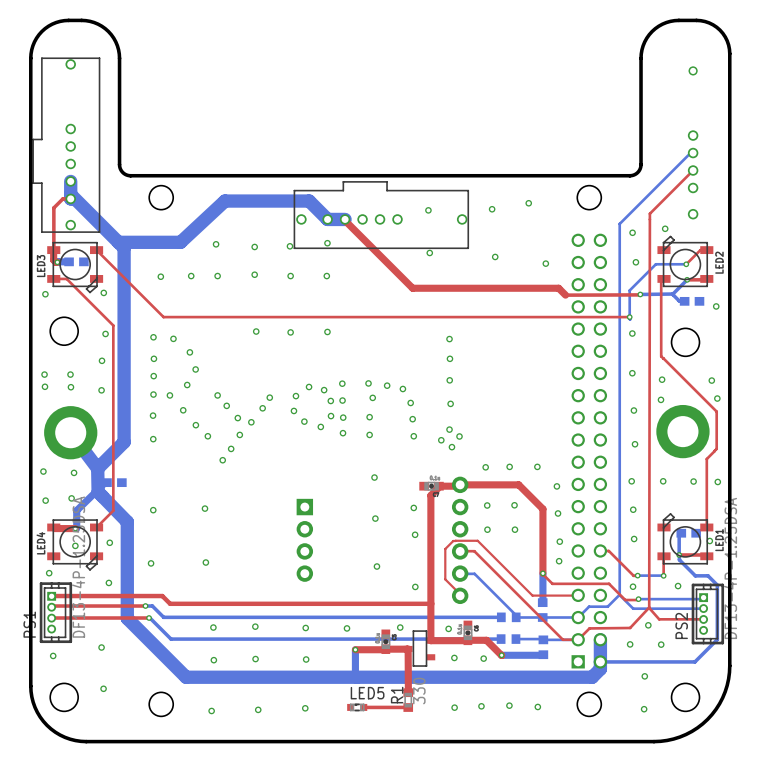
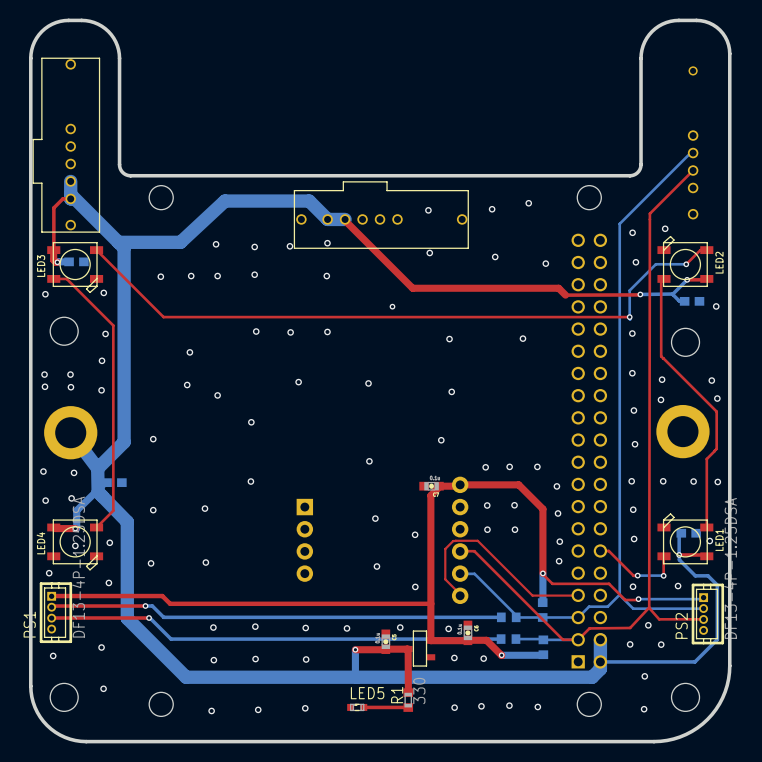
via: (290, 276) -> none
via: none -> (392, 306)
via: (153, 337) -> none
via: (173, 338) -> none
via: none -> (522, 338)
via: (153, 358) -> none
via: (449, 358) -> none
via: (195, 369) -> none
via: (153, 376) -> none
via: (449, 380) -> none
via: none -> (298, 382)
via: (342, 383) -> none
via: (387, 385) -> none
via: (309, 387) -> none
via: (402, 389) -> none
via: (324, 390) -> none
via: none -> (451, 391)
via: (153, 394) -> none
via: (169, 395) -> none
via: (295, 396) -> none
via: (269, 397) -> none
via: (372, 397) -> none
via: (330, 400) -> none
via: (342, 400) -> none
via: (410, 402) -> none
via: (450, 403) -> none
via: (226, 405) -> none
via: (262, 408) -> none
via: (183, 410) -> none
via: (293, 410) -> none
via: (153, 415) -> none
via: (331, 416) -> none
via: (343, 417) -> none
via: (369, 417) -> none
via: (237, 418) -> none
via: (412, 419) -> none
via: (304, 421) -> none
via: (195, 425) -> none
via: (320, 426) -> none
via: (449, 429) -> none
via: (343, 433) -> none
via: (239, 434) -> none
via: (369, 434) -> none
via: (207, 436) -> none
via: (413, 436) -> none
via: (459, 436) -> none
via: (451, 447) -> none
via: (231, 448) -> none
via: (222, 460) -> none
via: none -> (369, 461)
via: (374, 477) -> none
via: none -> (250, 481)
via: (413, 507) -> none

